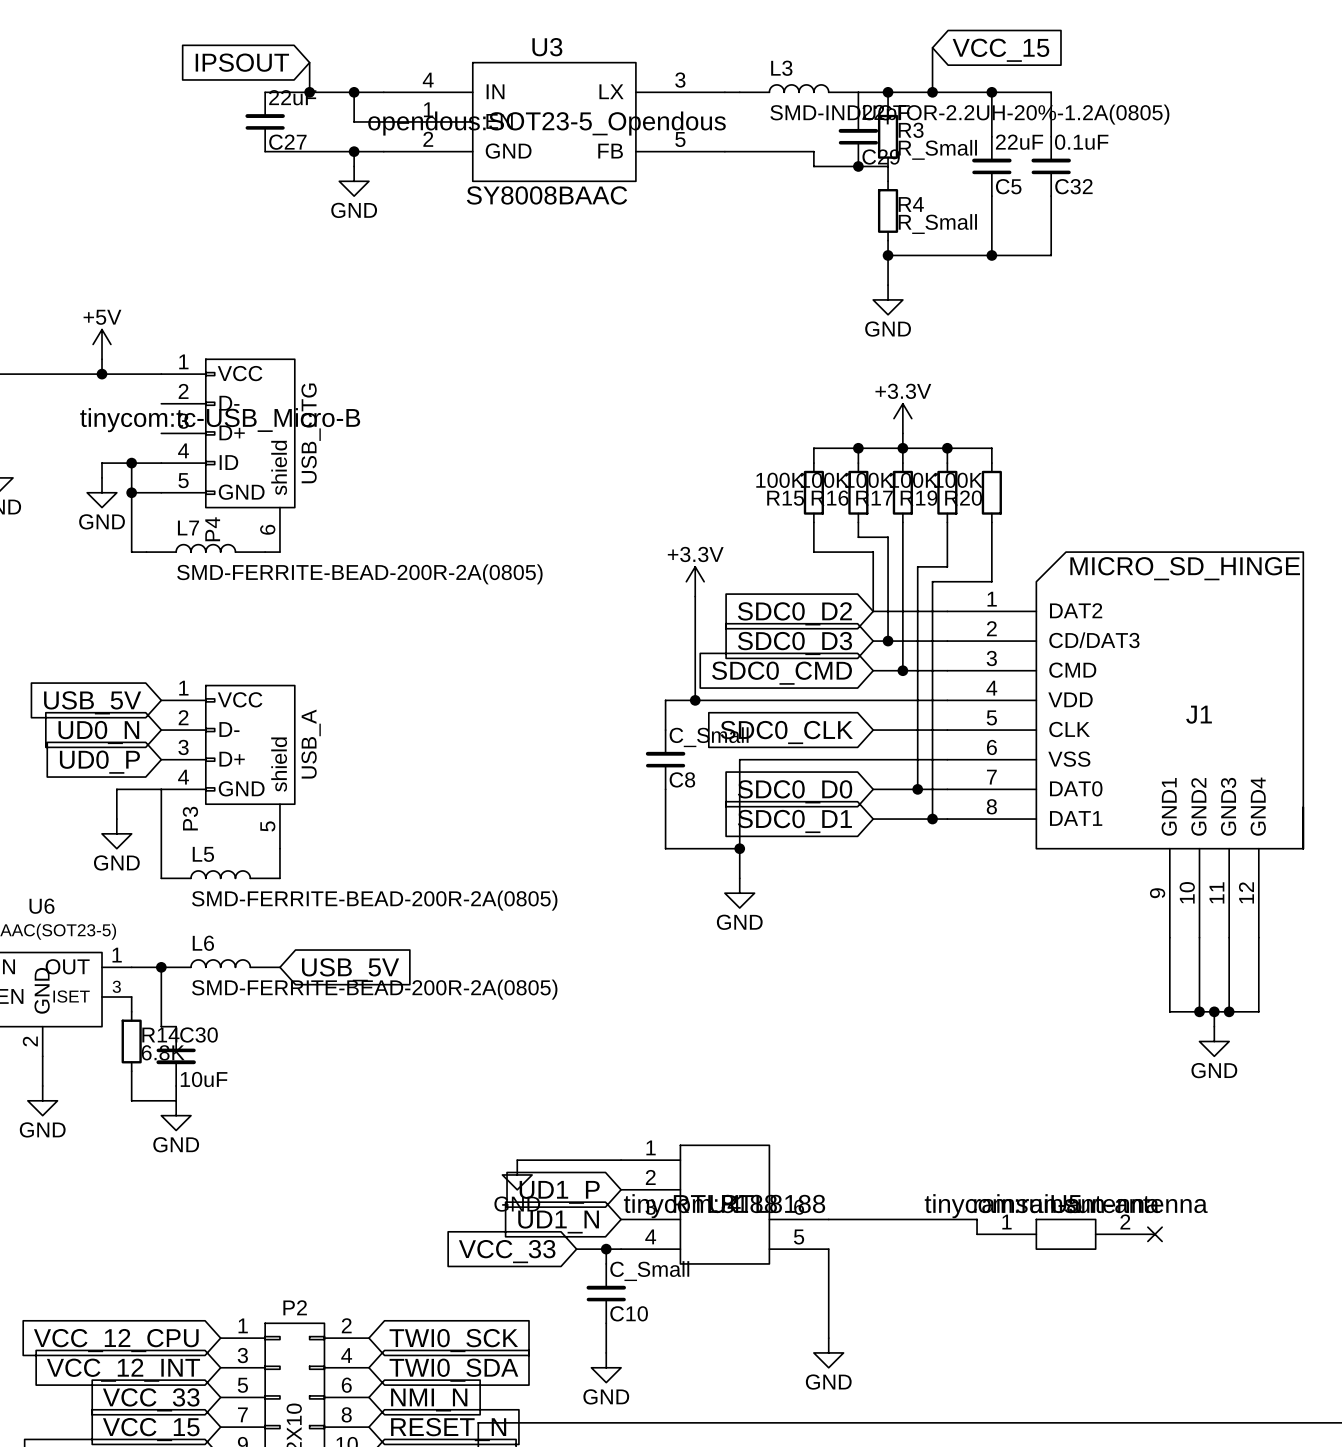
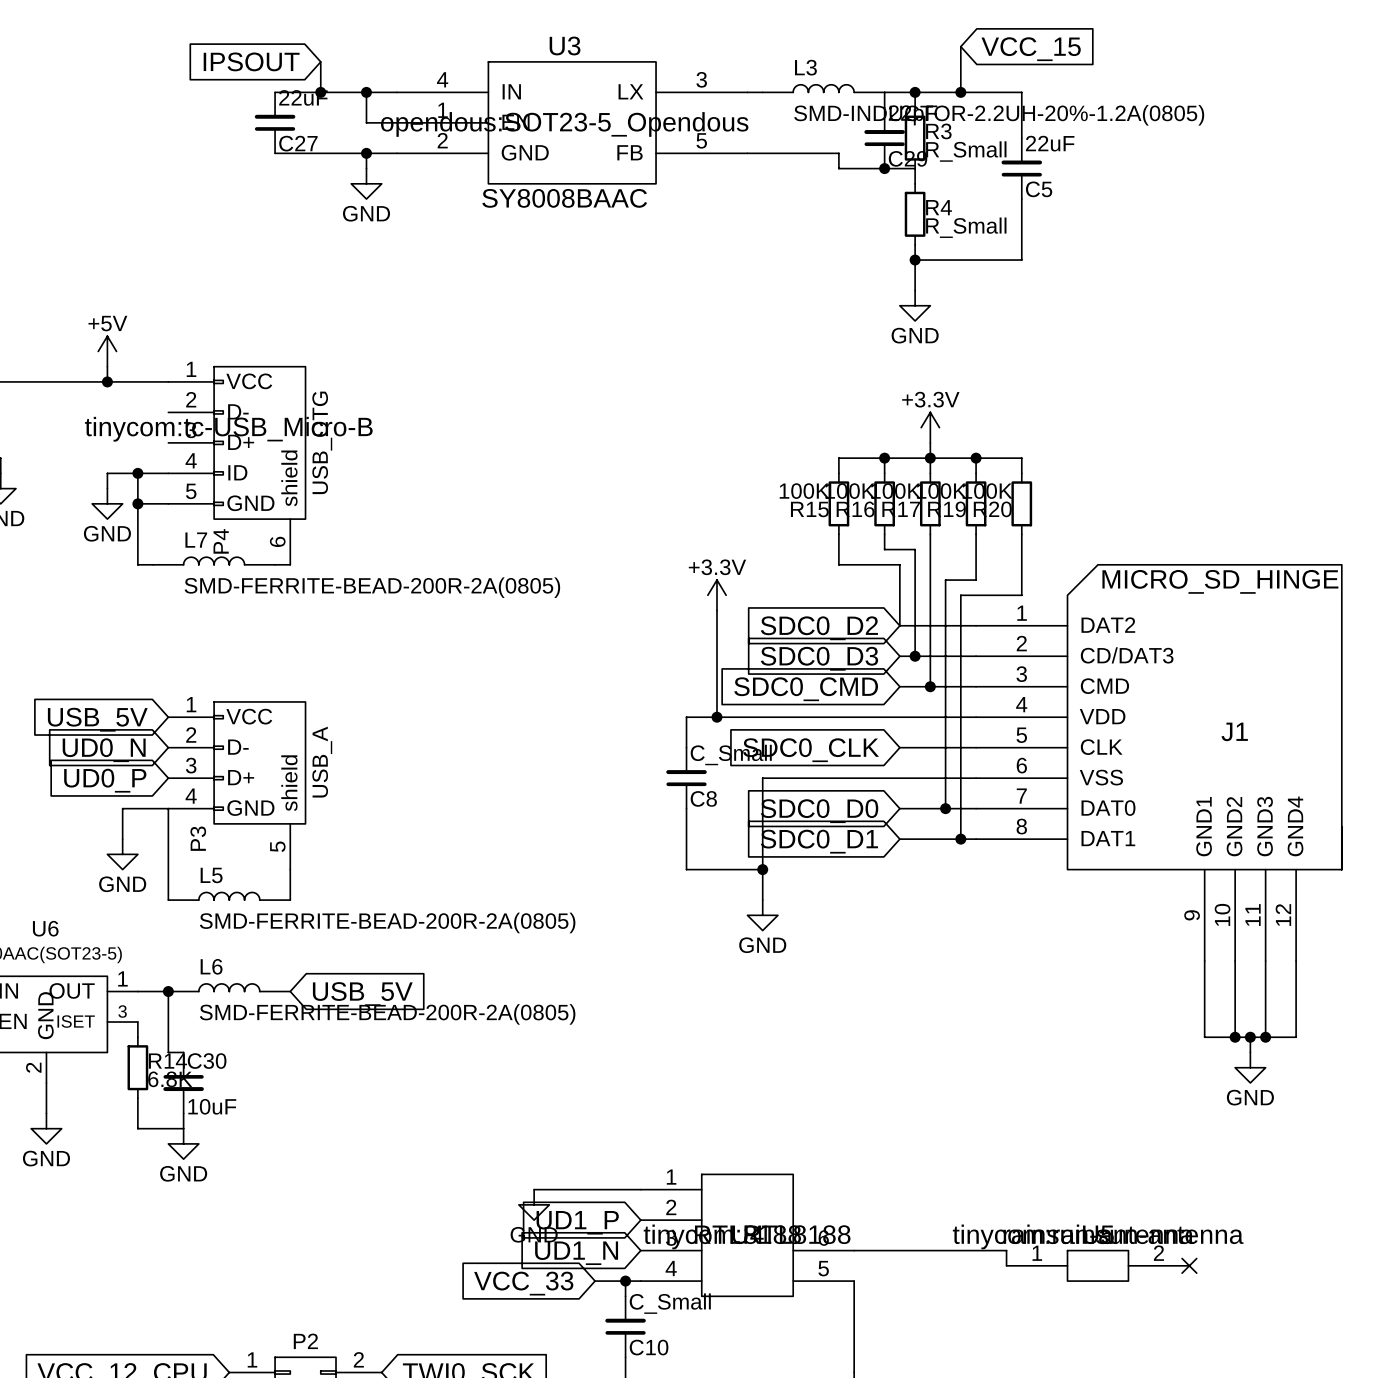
wire: (991, 92) (1051, 92) (1051, 136) -> none
junction: (991, 92) -> none
C32: 0.1uF (1051, 166) -> none
wire: (1051, 196) (1051, 255) (991, 255) -> none
junction: (991, 255) -> none

